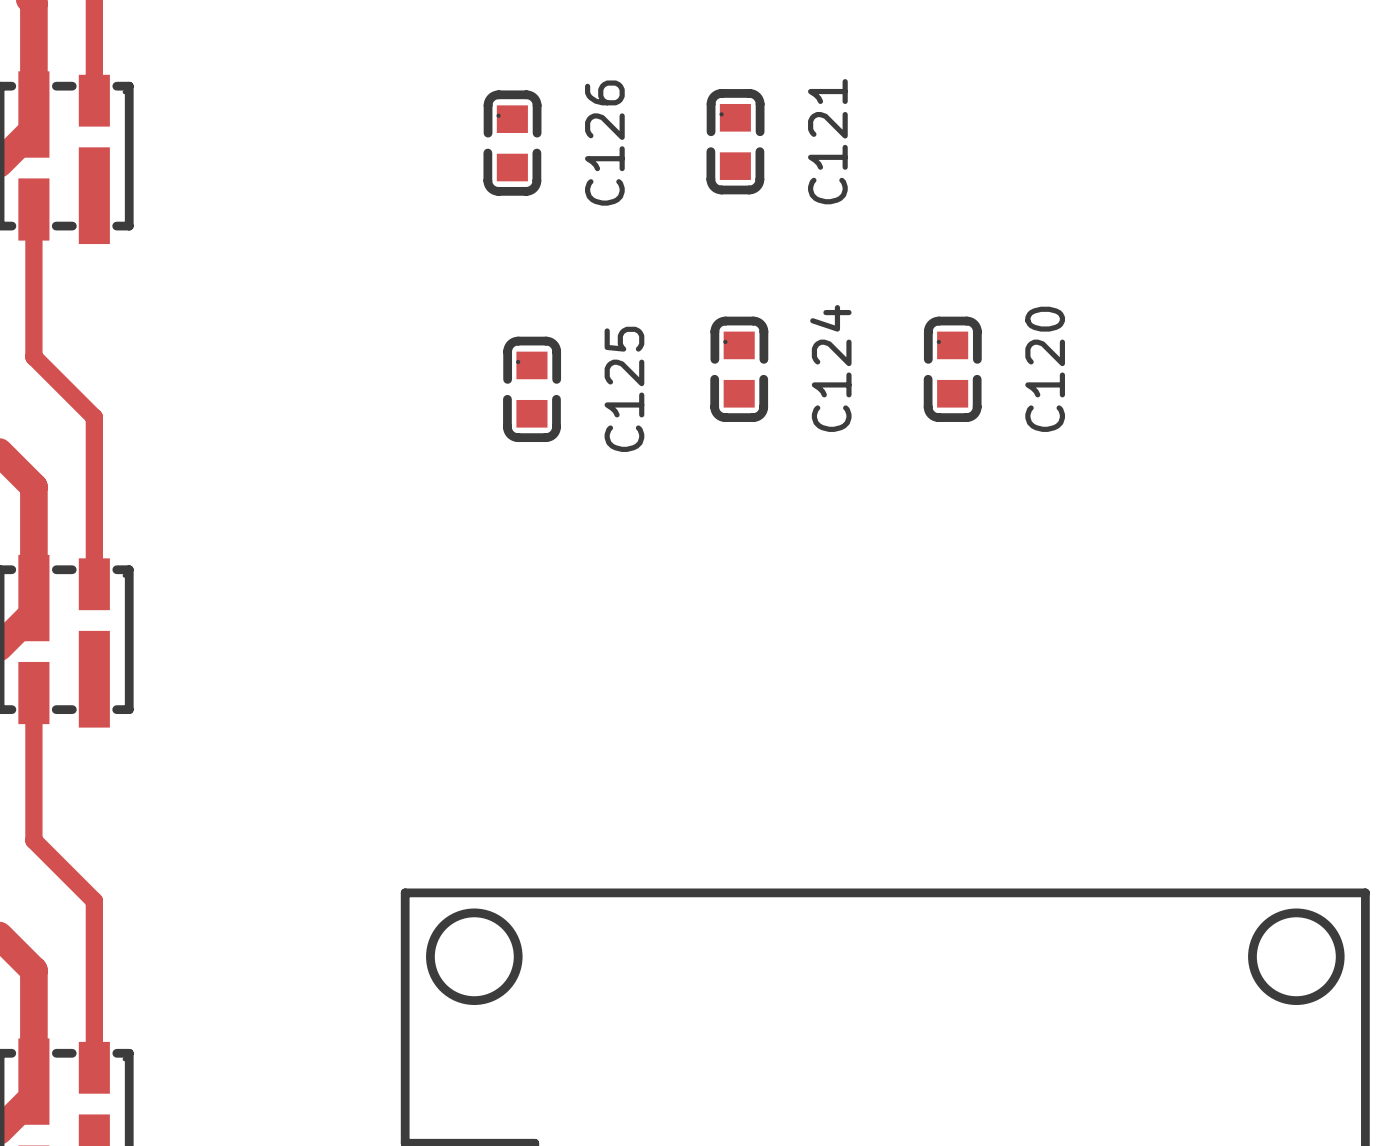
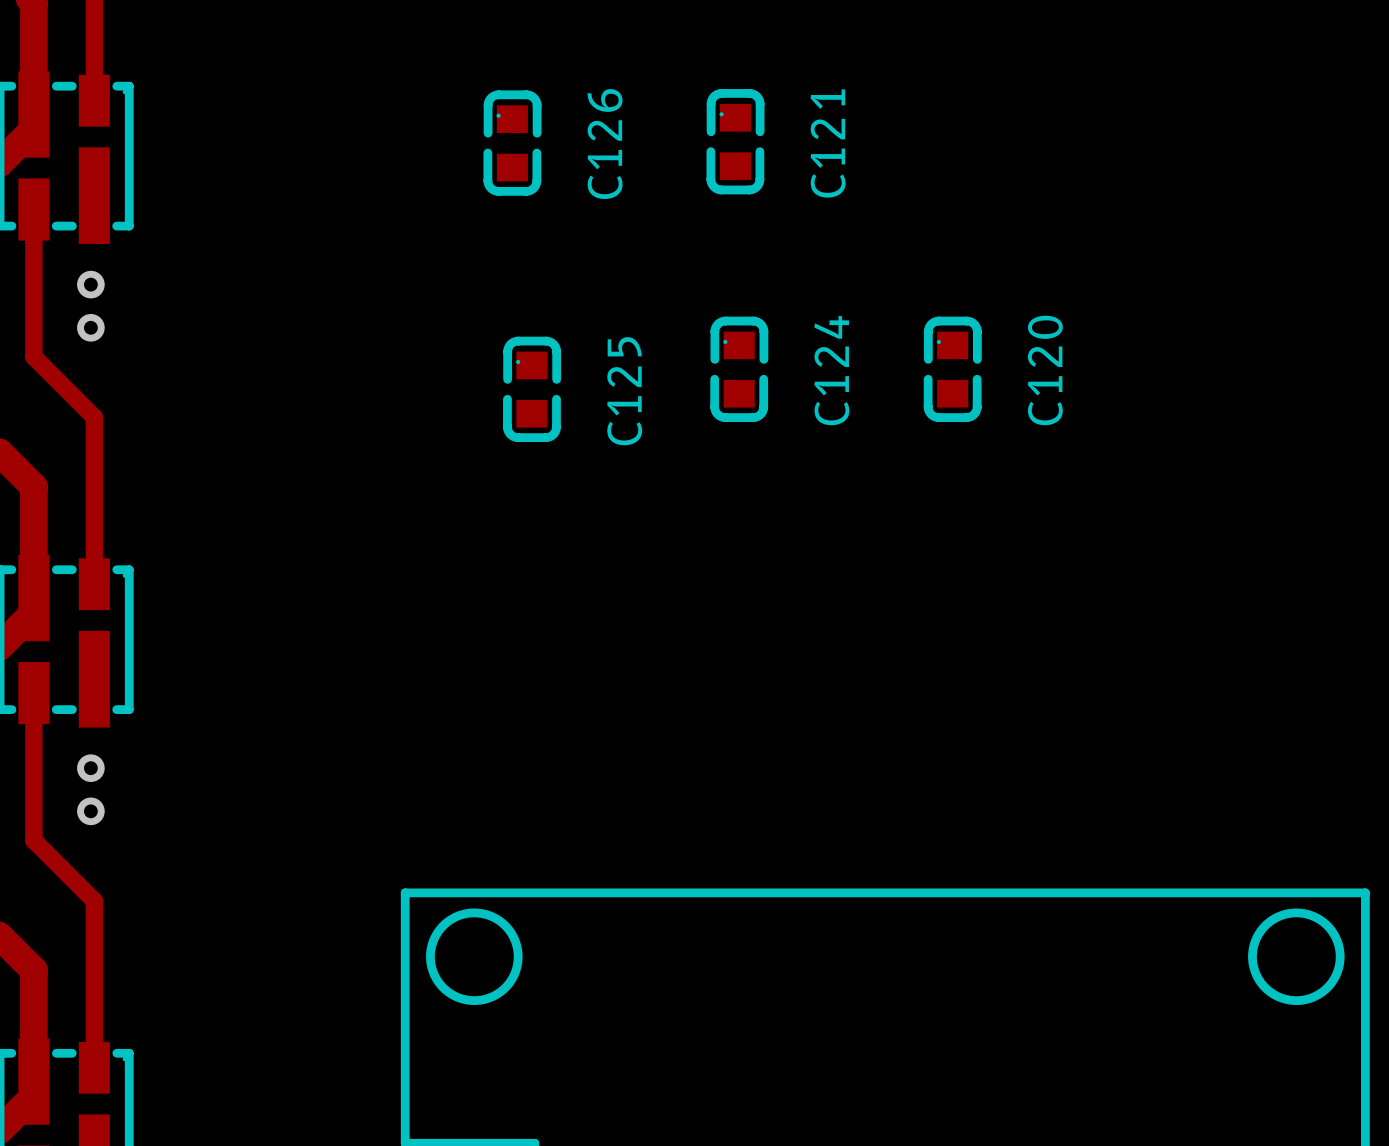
via: none -> (90, 284)
via: none -> (90, 327)
via: none -> (90, 768)
via: none -> (90, 811)

